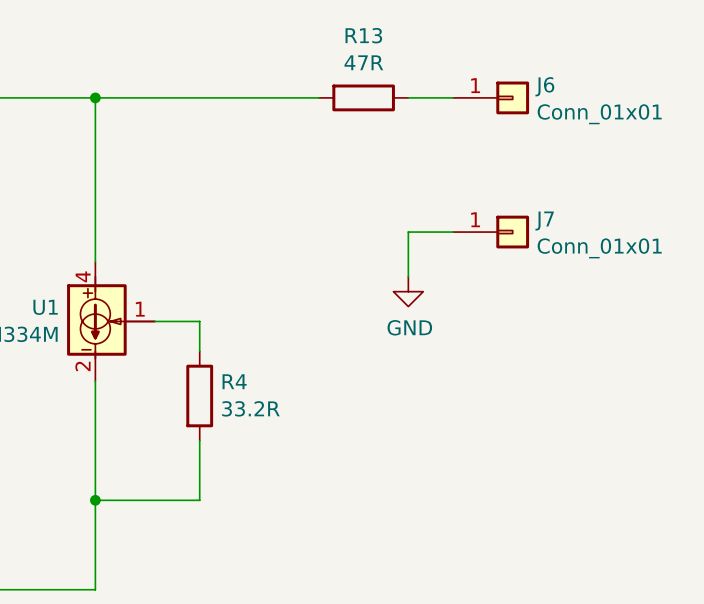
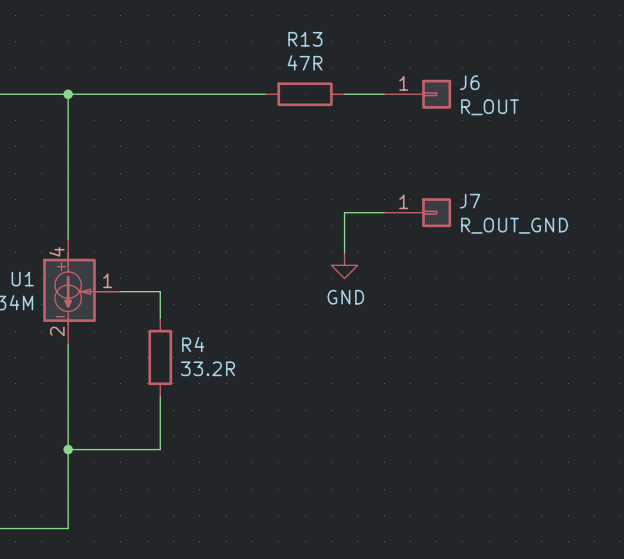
J6 value: Conn_01x01 (599, 114) -> R_OUT (490, 107)
J7 value: Conn_01x01 (599, 248) -> R_OUT_GND (514, 225)

